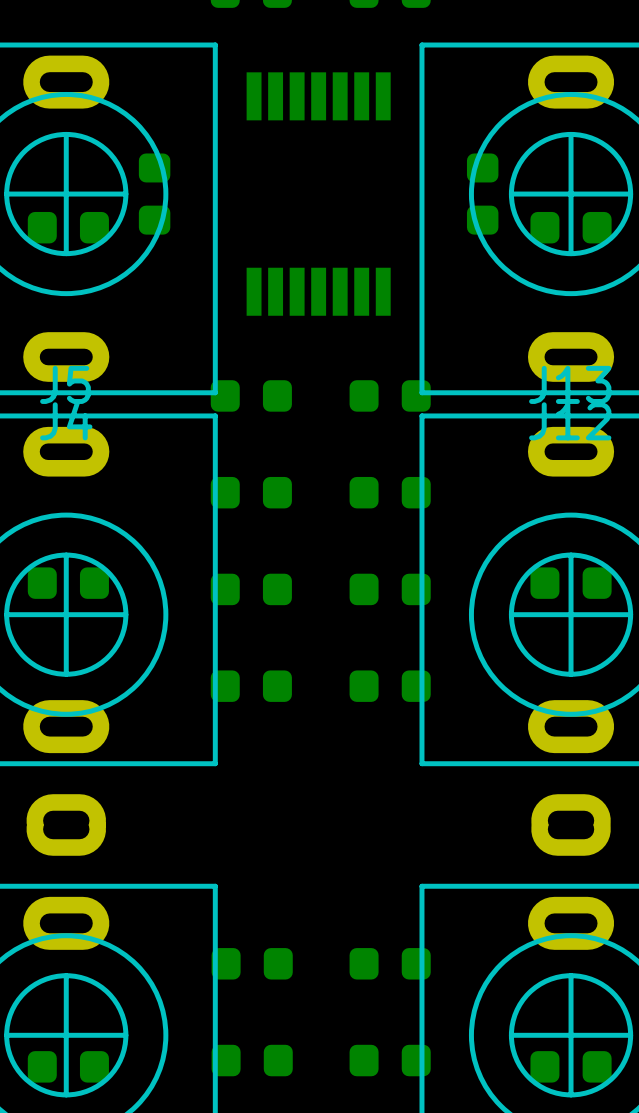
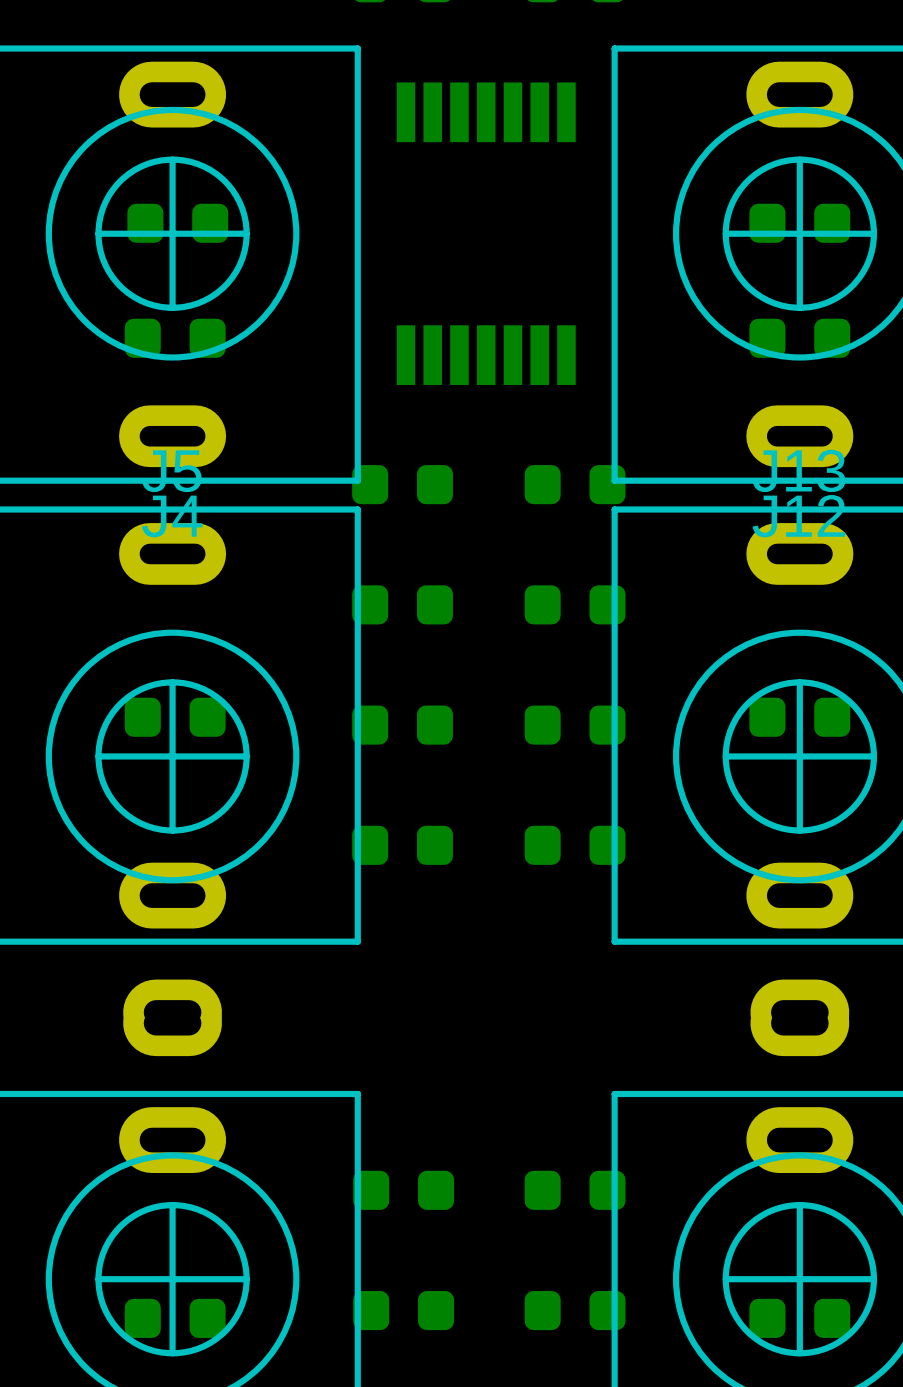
part: none -> (177, 223)
part: none -> (799, 223)
part: (154, 194) -> none
part: (482, 194) -> none
part: (68, 227) -> none
part: (571, 227) -> none
part: none -> (175, 338)
part: none -> (799, 338)

